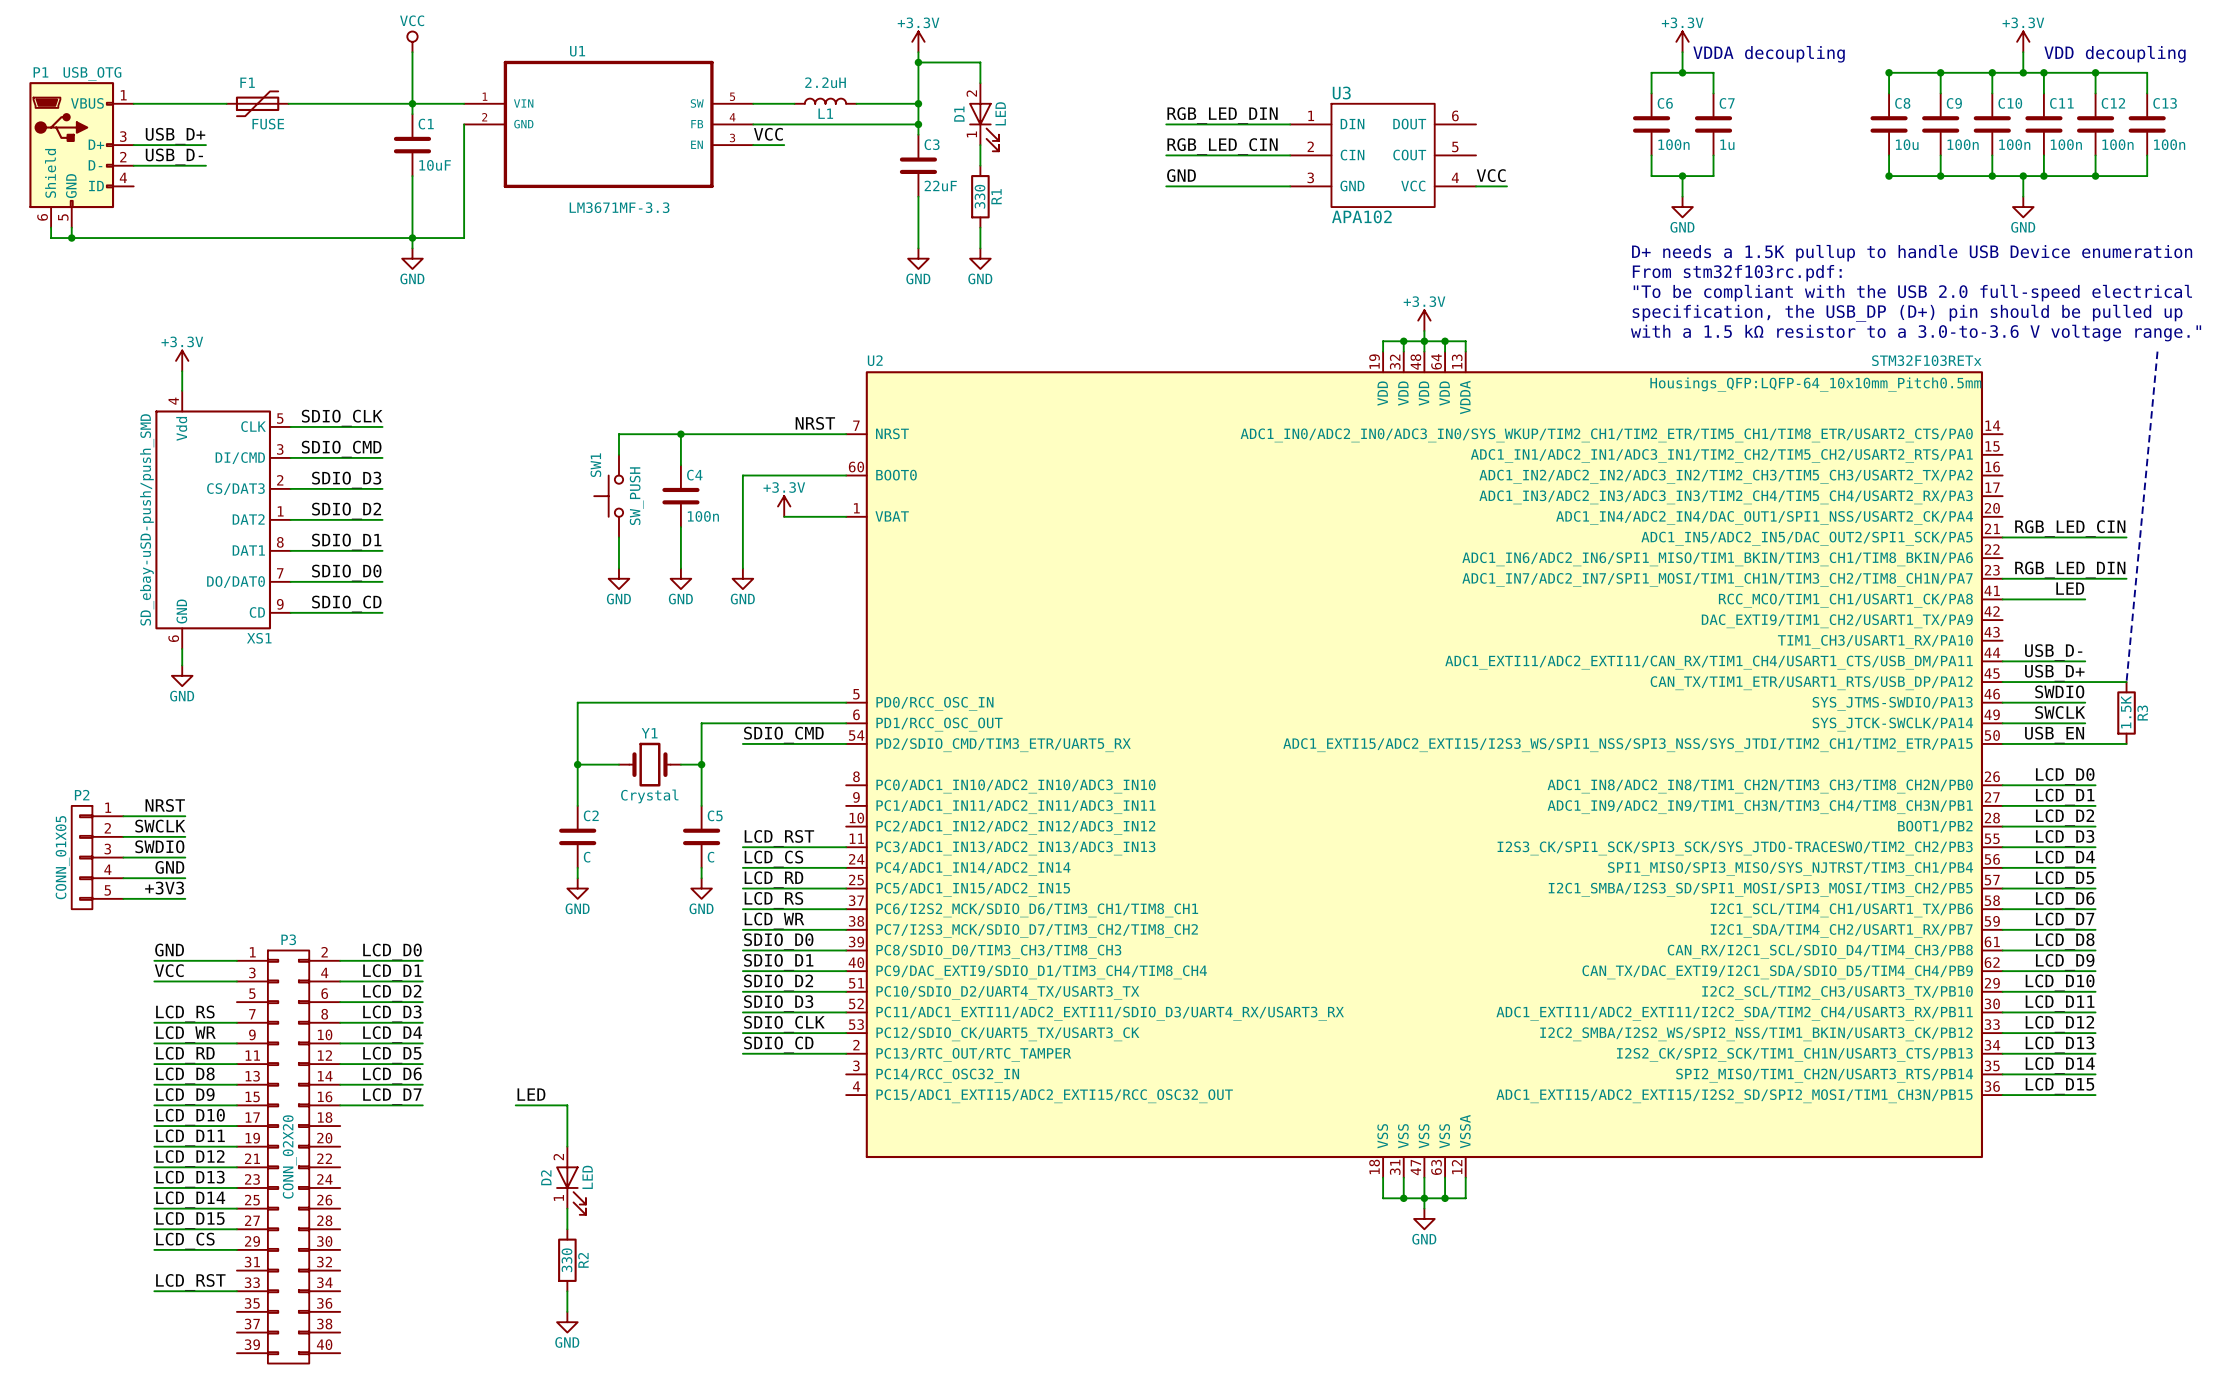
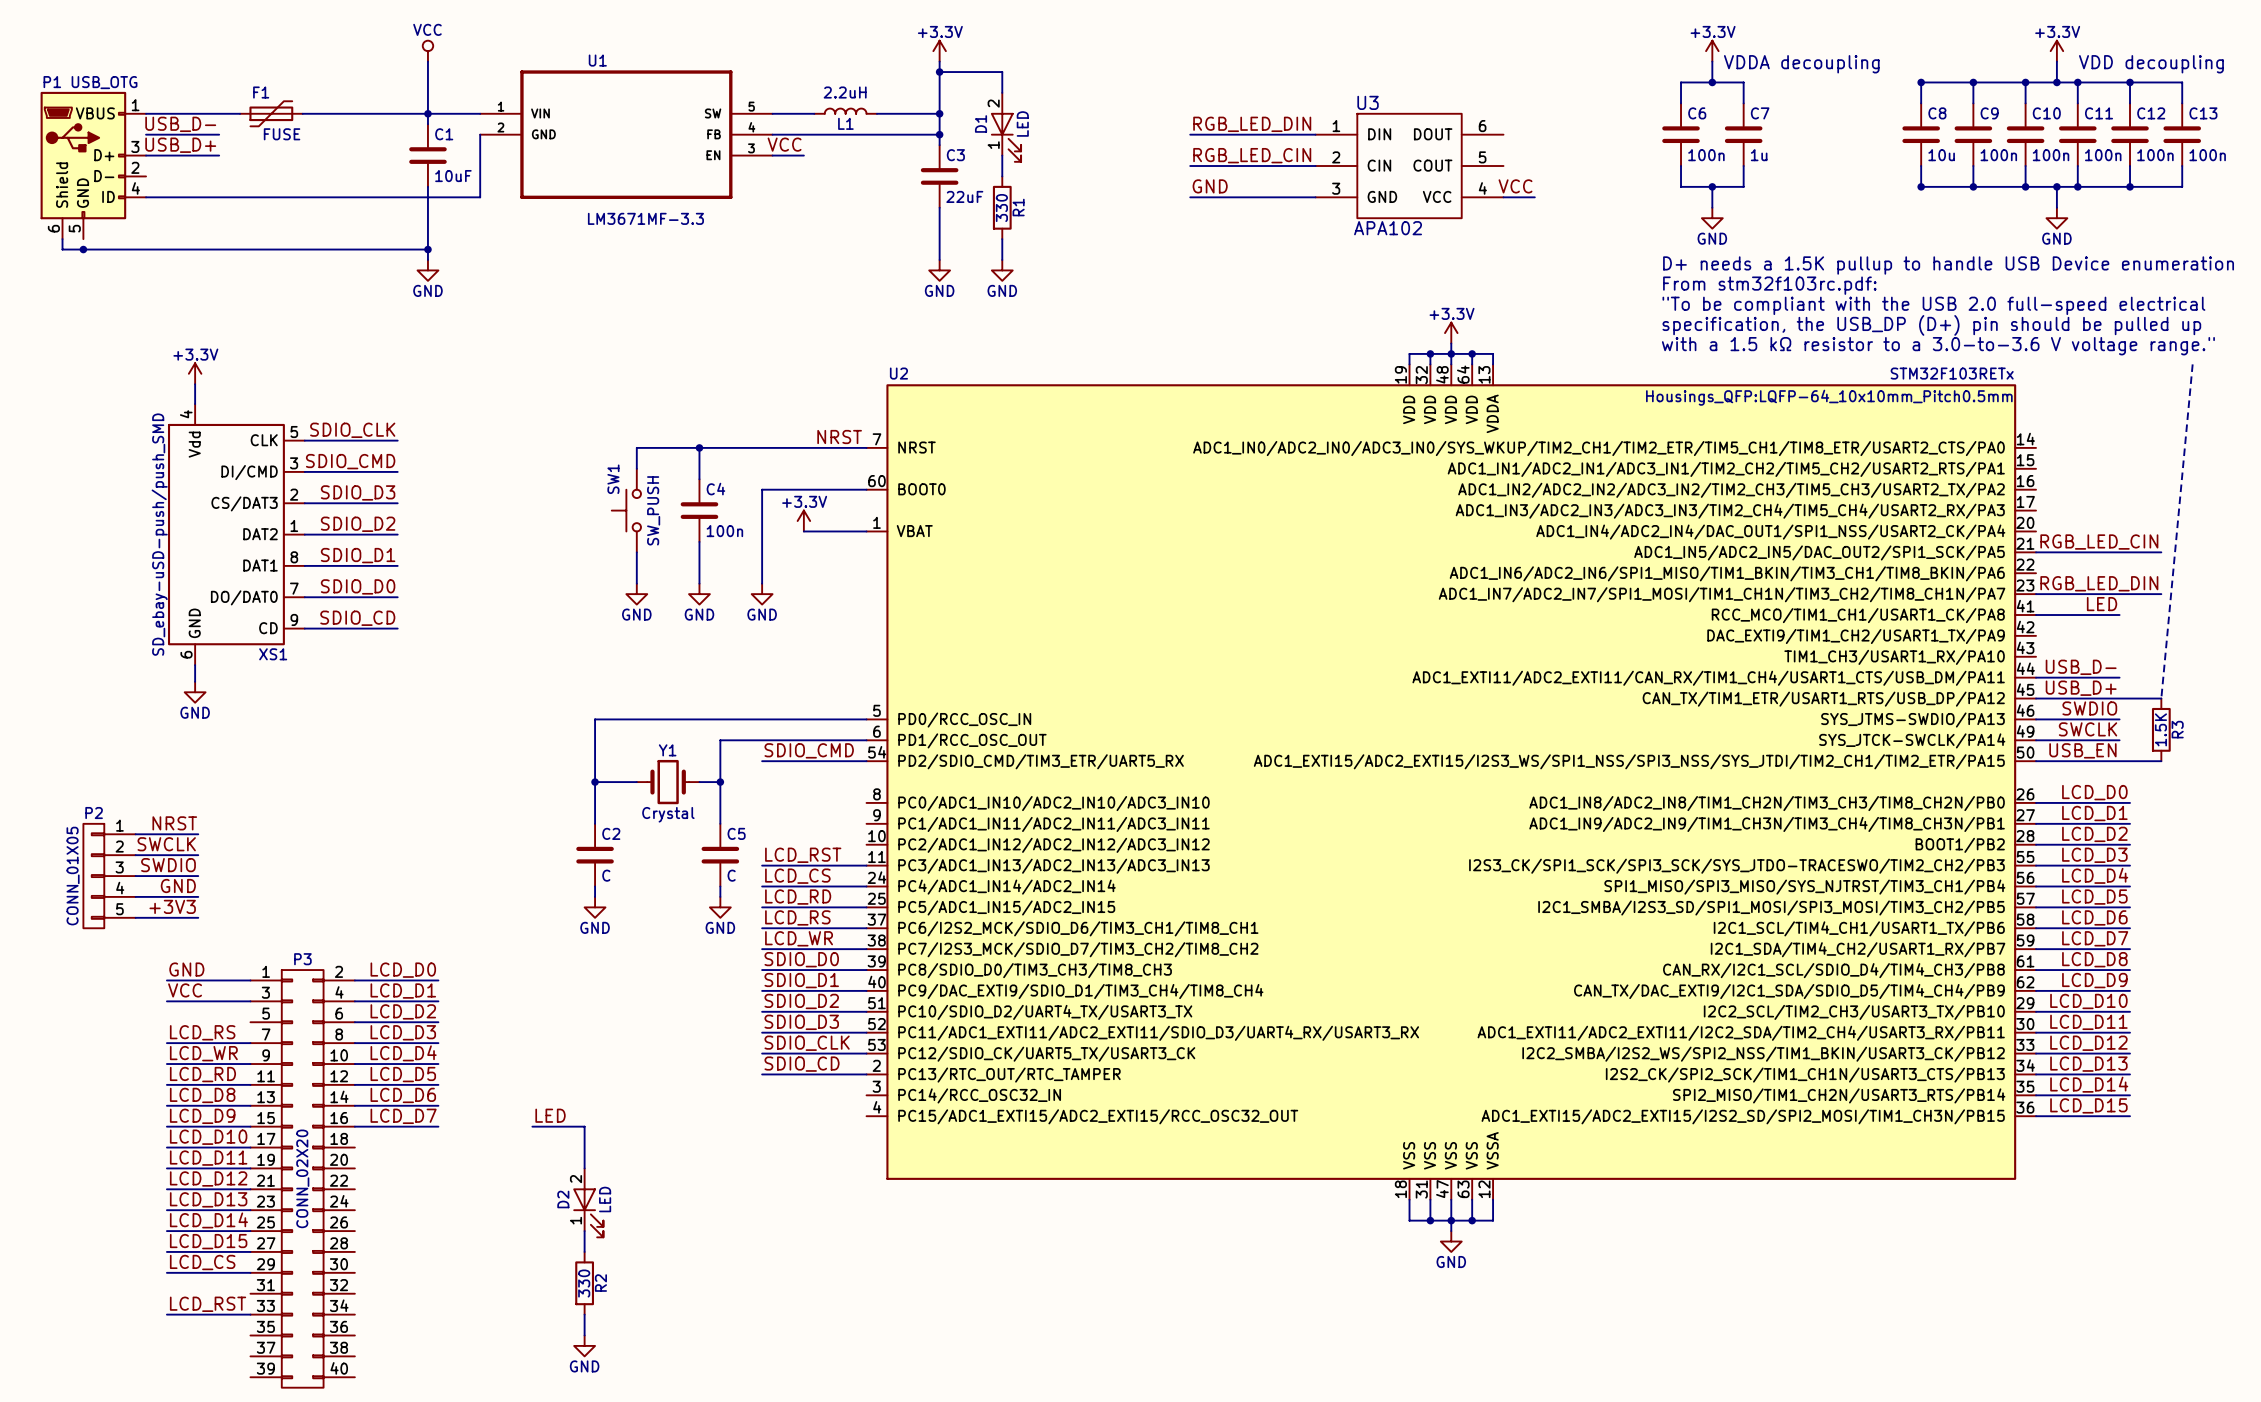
label position: USB_D- (174, 156) -> USB_D- (180, 124)
wire: (133, 165) (205, 165) -> (146, 134) (219, 134)
wire: (464, 186) (464, 238) (412, 238) -> (480, 197) (146, 197)
wire: (71, 227) (71, 238) -> none

